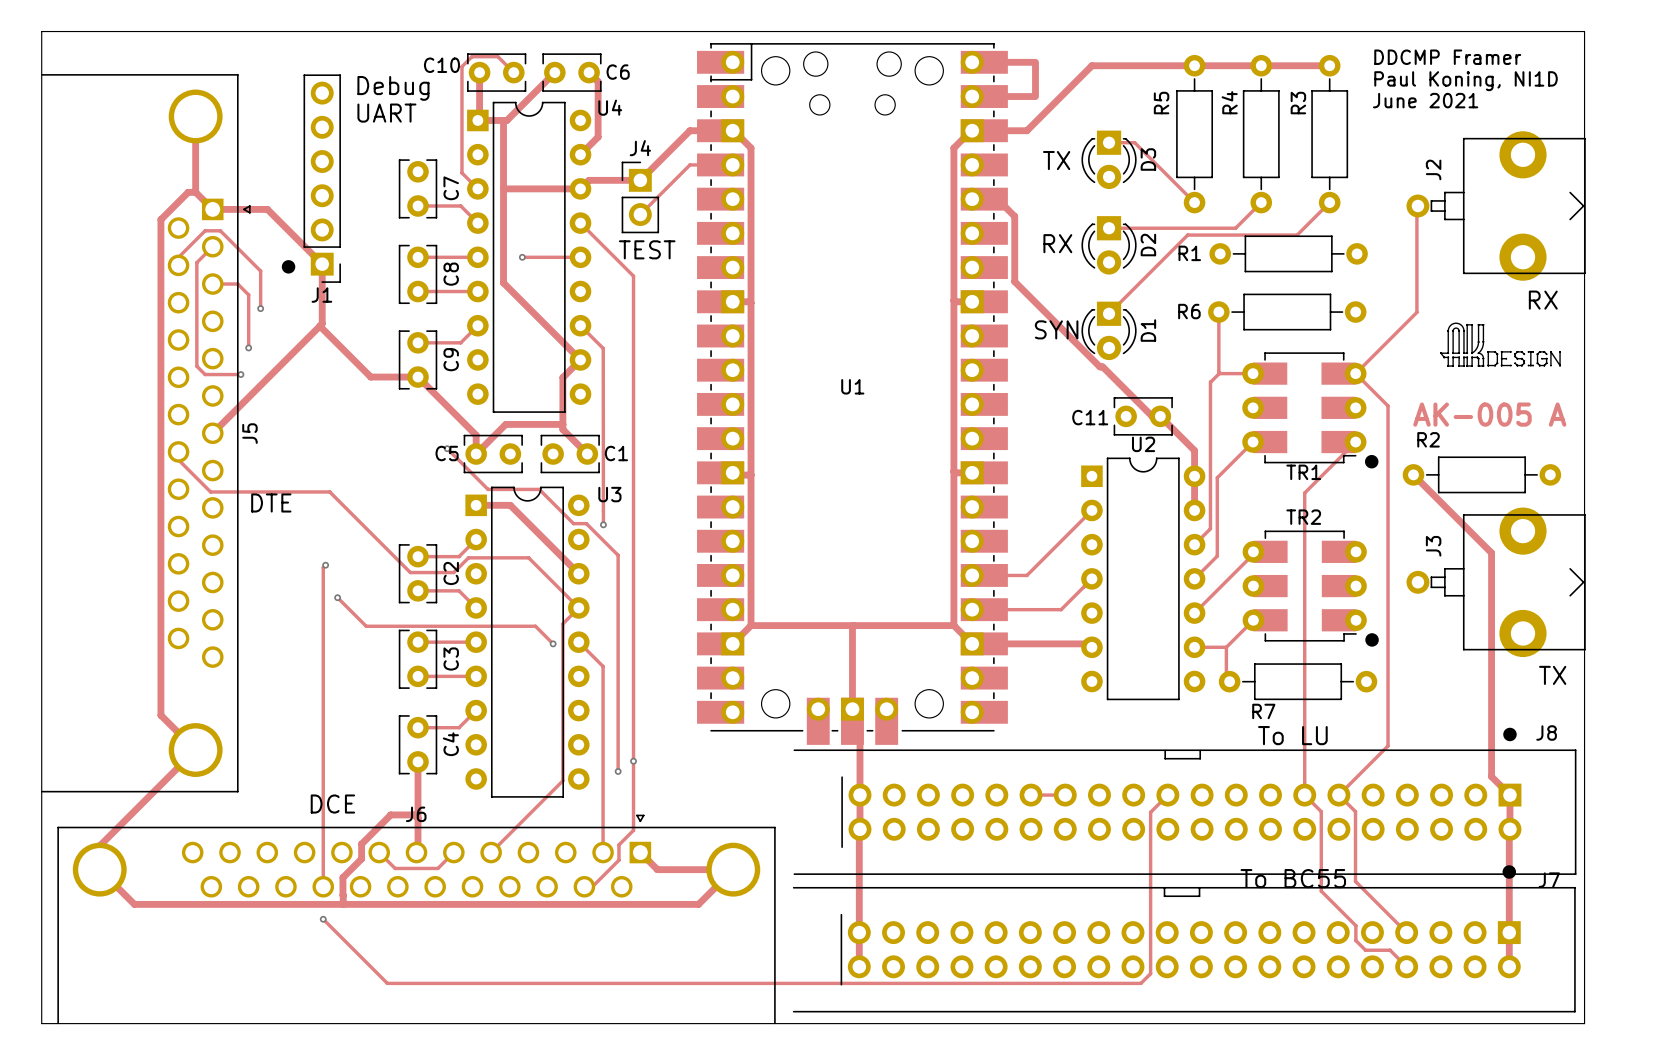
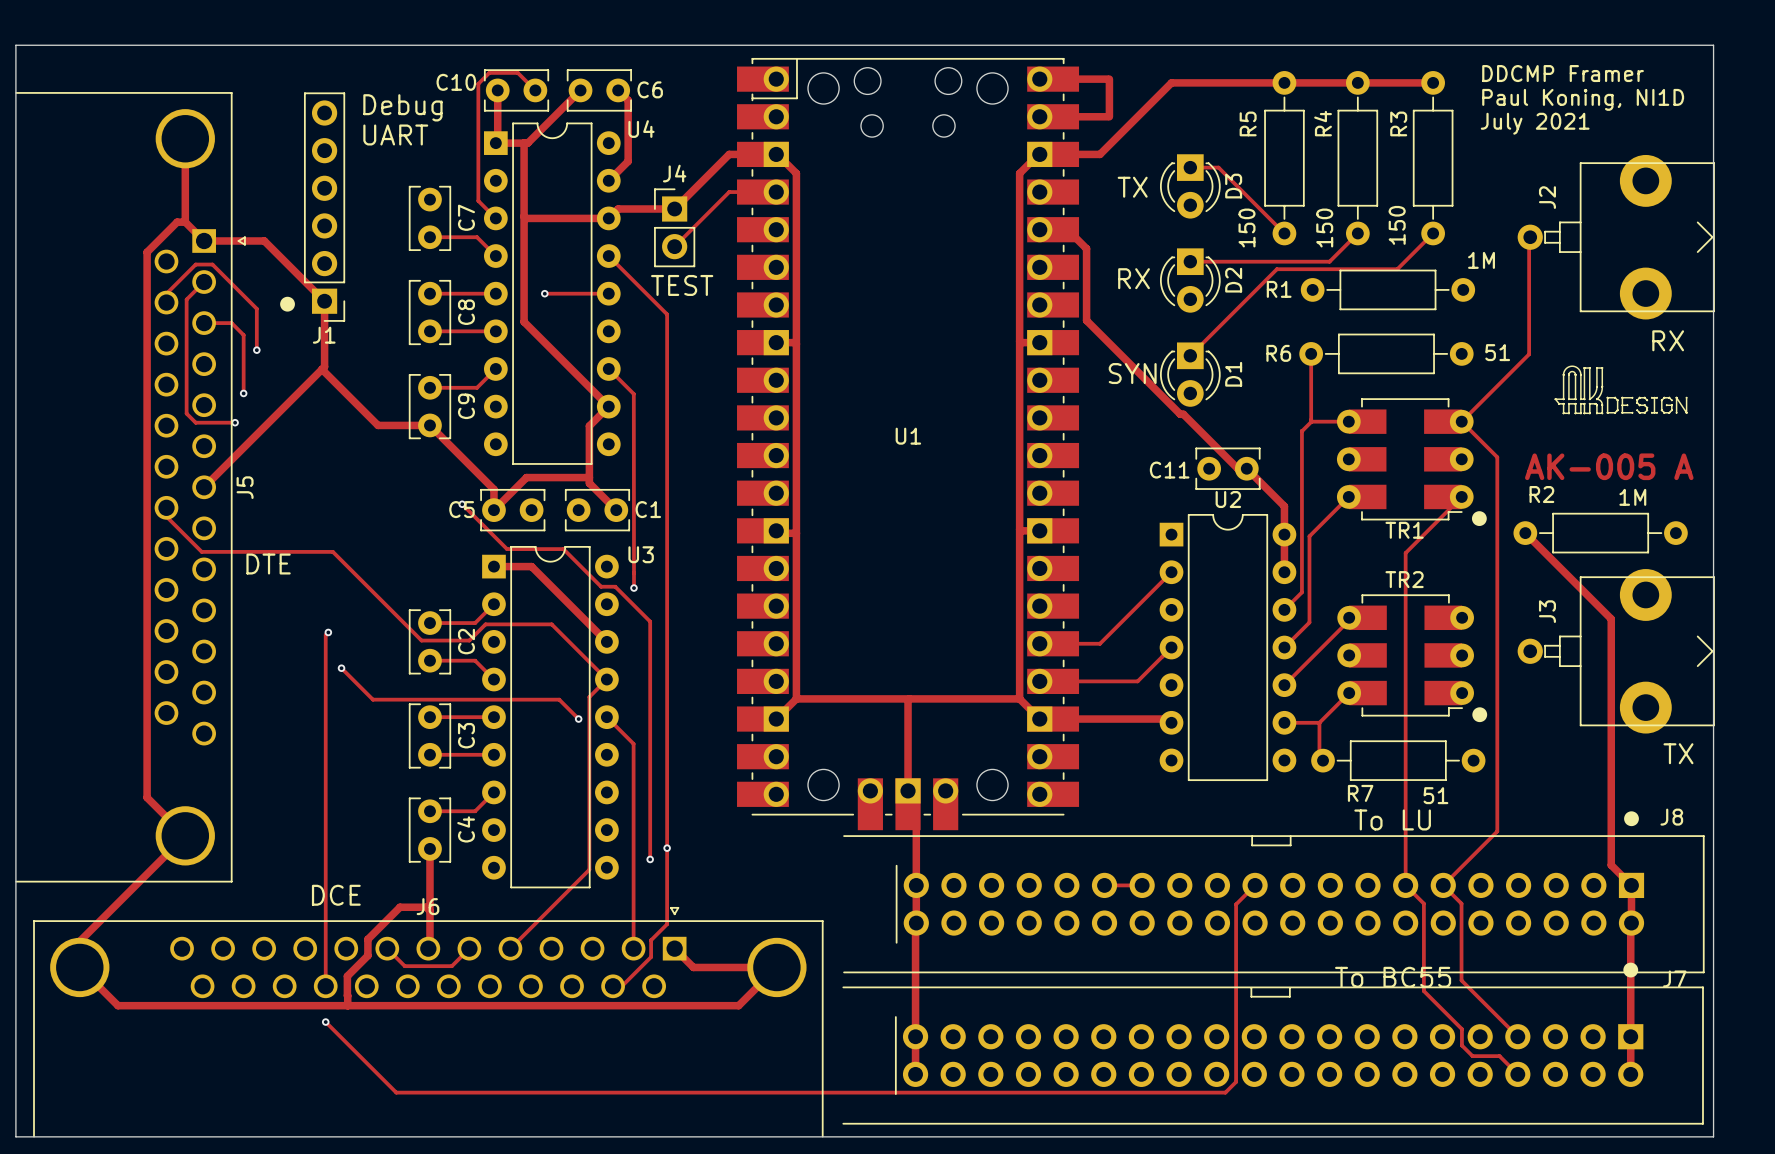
text: June 2021 (1425, 100) -> July 2021 (1535, 123)
R3 value: none -> 150 (1397, 225)
R5 value: none -> 150 (1247, 228)
R4 value: none -> 150 (1324, 228)
R1 value: none -> 1M (1481, 260)
R6 value: none -> 51 (1497, 352)
R2 value: none -> 1M (1632, 497)
R7 value: none -> 51 (1435, 795)

